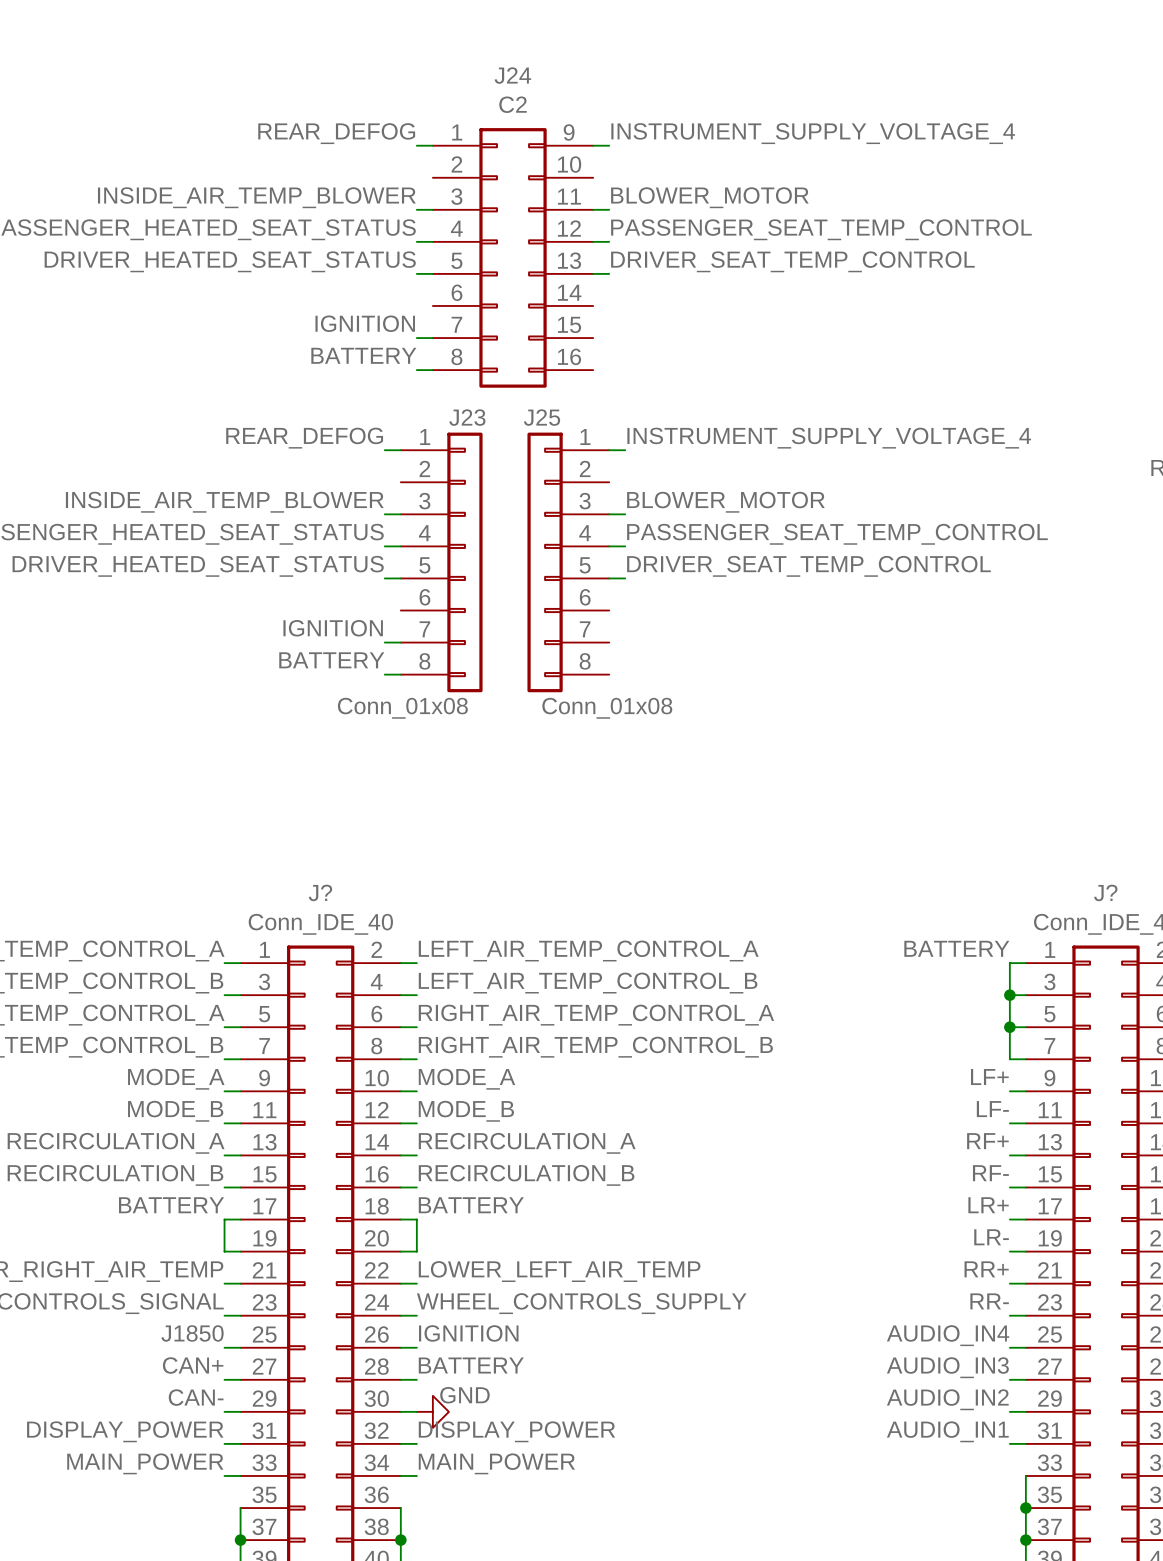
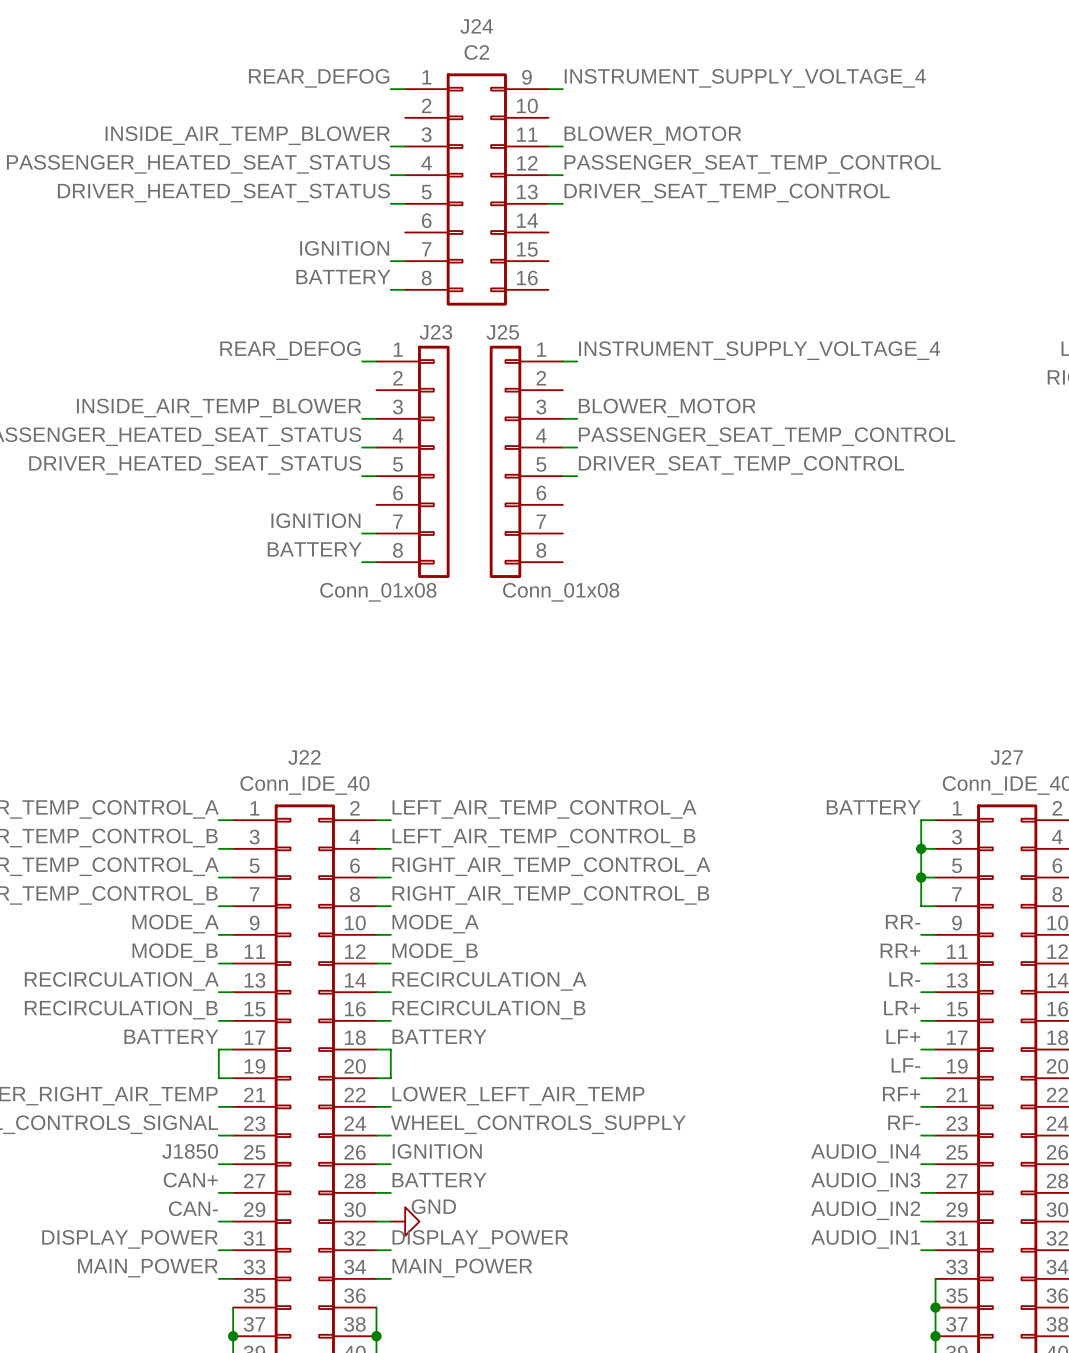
J? name: J? (320, 892) -> J22 (304, 757)
J? name: J? (1105, 892) -> J27 (1006, 757)
label: LF+ (989, 1077) -> RR- (903, 922)
label: LF- (992, 1109) -> RR+ (900, 950)
label: RF+ (987, 1141) -> LR- (904, 979)
label: RF- (990, 1173) -> LR+ (902, 1008)
label: LR+ (988, 1205) -> LF+ (903, 1036)
label: LR- (991, 1237) -> LF- (905, 1065)
label: RR+ (986, 1269) -> RF+ (901, 1094)
label: RR- (989, 1301) -> RF- (904, 1122)

